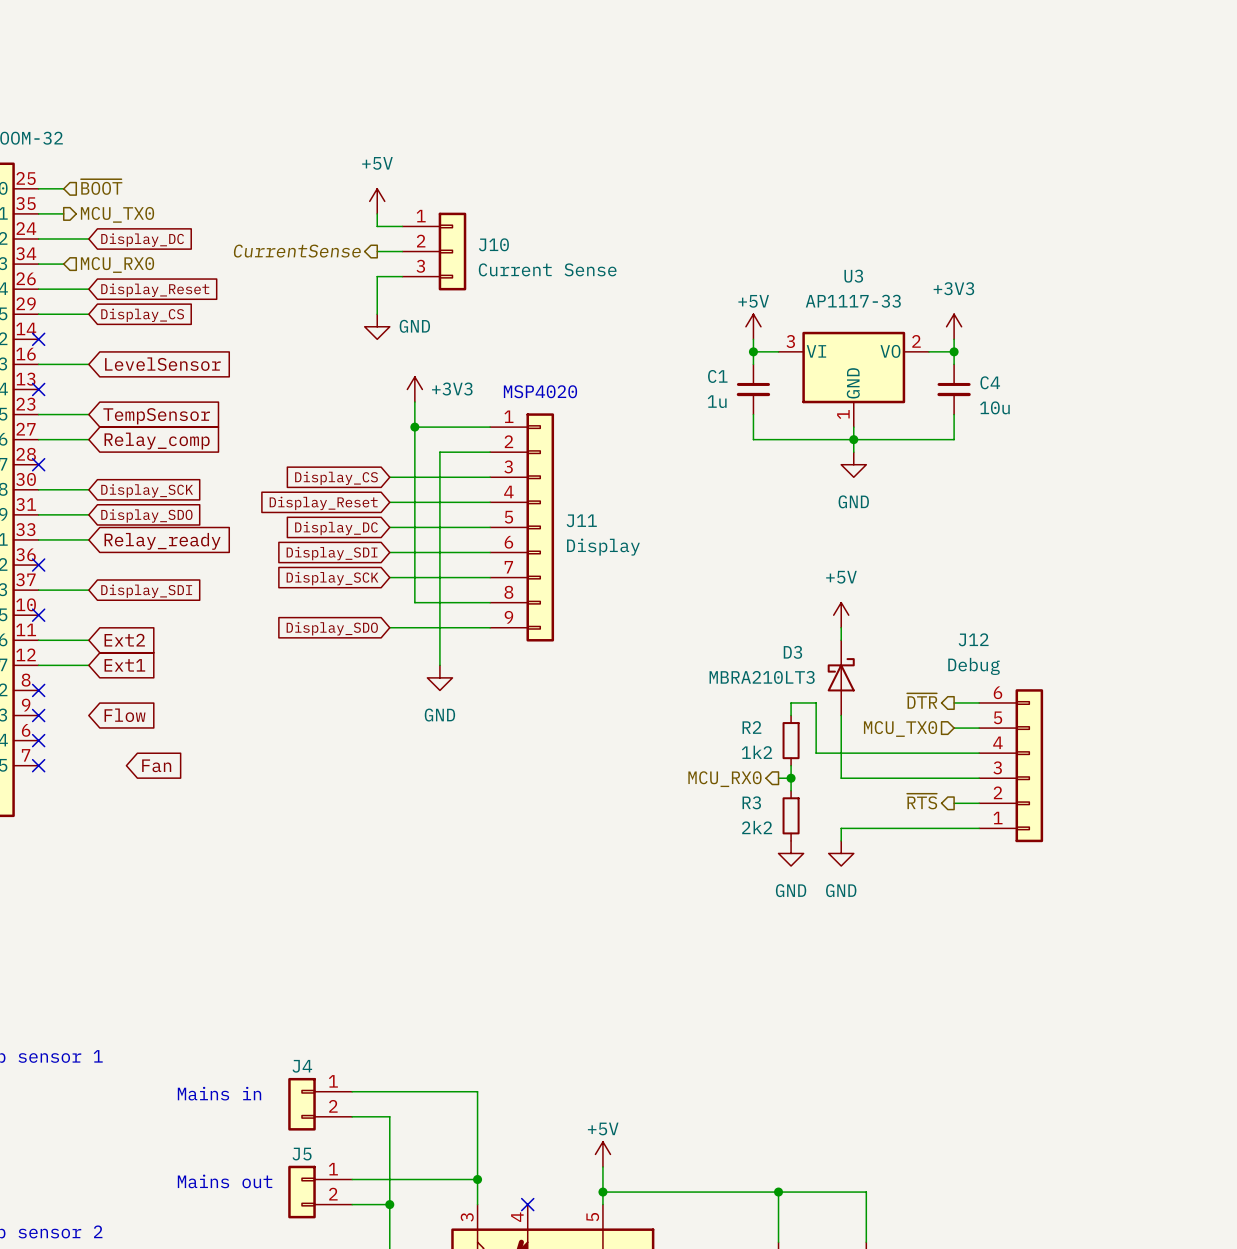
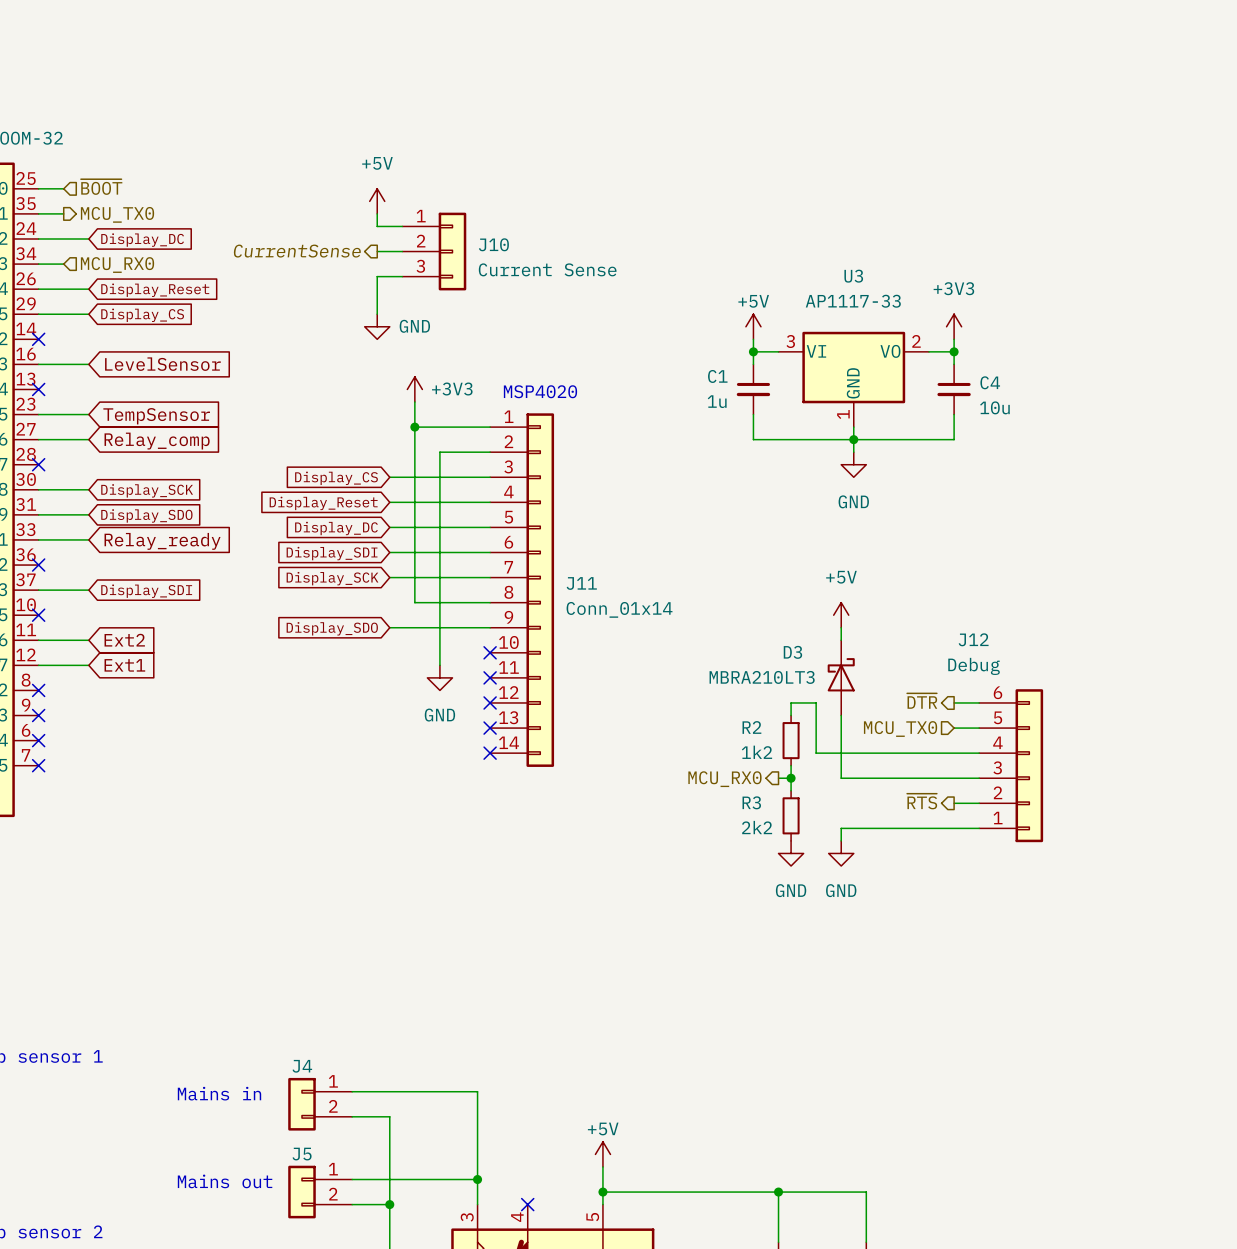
J11 symbol: [490, 413, 555, 642] -> [490, 413, 555, 767]
J11 value: Display (603, 547) -> Conn_01x14 (619, 609)
no-connect mark: none -> (490, 652)
no-connect mark: none -> (490, 677)
no-connect mark: none -> (490, 702)
global label: Flow (125, 715) -> none
no-connect mark: none -> (490, 728)
no-connect mark: none -> (490, 753)
global label: Fan (156, 765) -> none

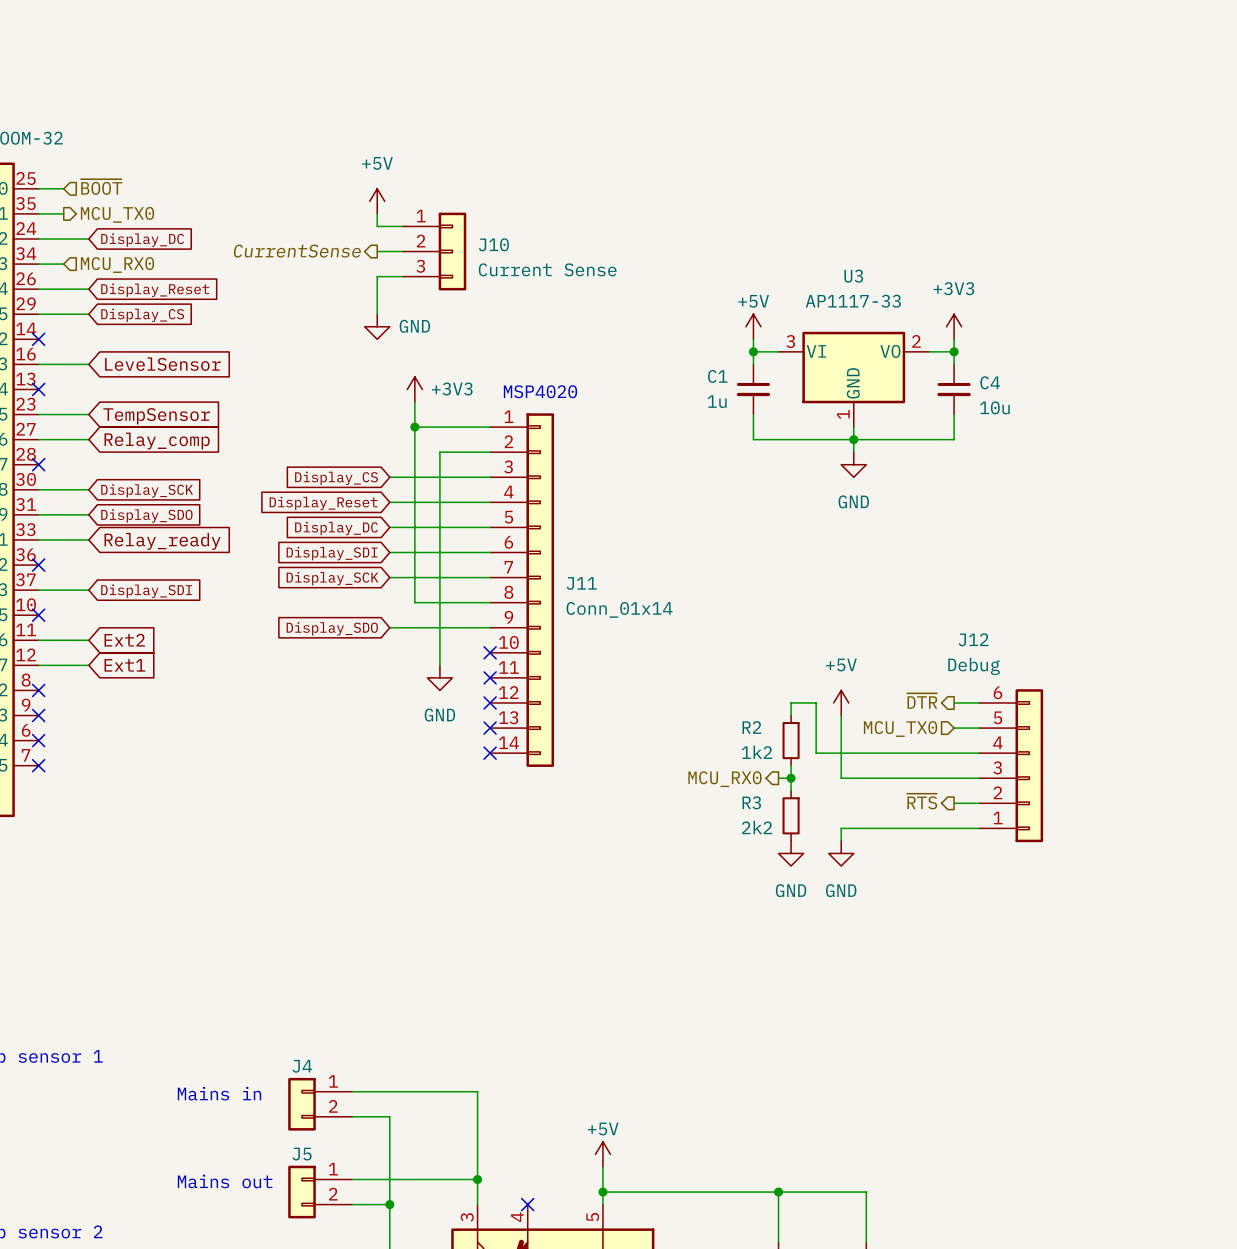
power symbol position: +5V (841, 615) -> +5V (841, 702)
wire: (841, 627) (841, 640) -> none
D3: MBRA210LT3 (841, 677) -> none

